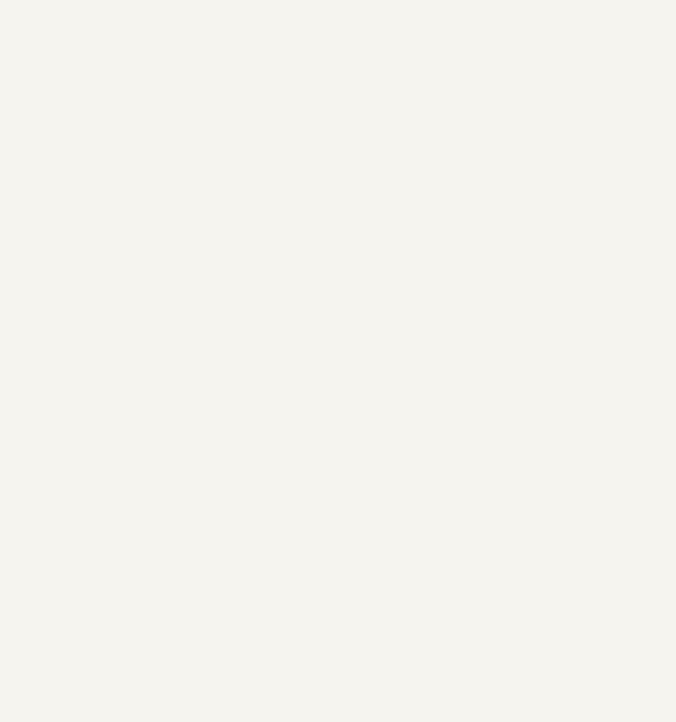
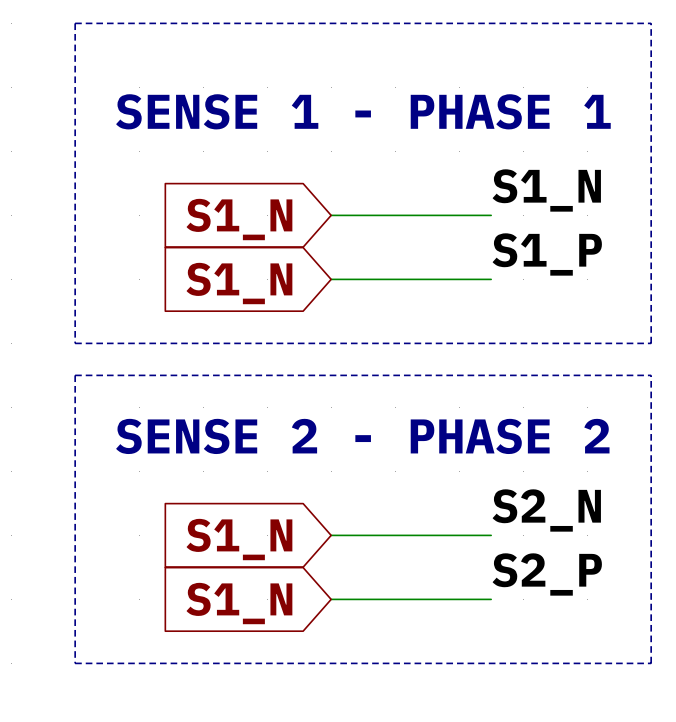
line: none -> (75, 23) (75, 343) (651, 343) (651, 23) (75, 23)
text: none -> SENSE 1 - PHASE 1 (363, 111)
label: none -> S1_N (546, 190)
global label: none -> S1_N (239, 219)
wire: none -> (331, 215) (491, 215)
label: none -> S1_P (547, 254)
global label: none -> S1_N (239, 283)
wire: none -> (331, 279) (491, 279)
line: none -> (75, 375) (651, 375) (651, 663) (75, 663) (75, 375)
text: none -> SENSE 2 - PHASE 2 (362, 436)
label: none -> S2_N (546, 510)
global label: none -> S1_N (239, 539)
wire: none -> (331, 535) (491, 535)
label: none -> S2_P (547, 574)
global label: none -> S1_N (239, 603)
wire: none -> (331, 599) (491, 599)

